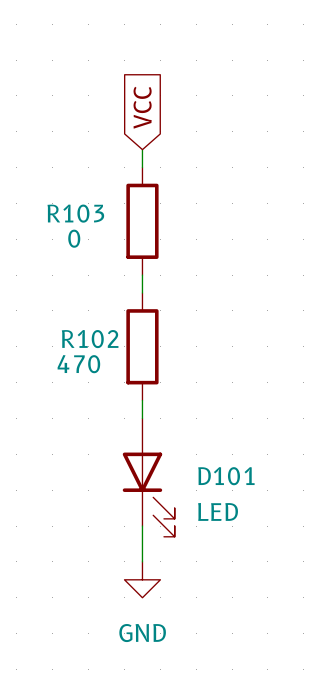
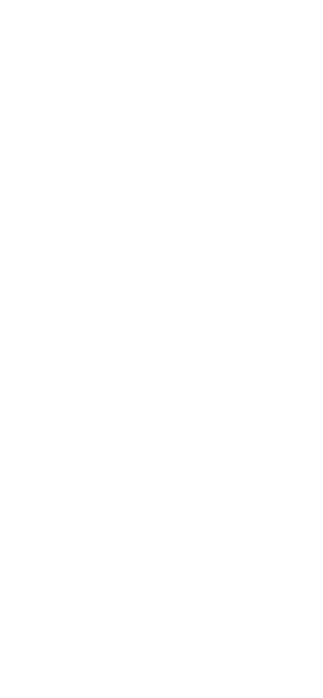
global label: VCC (142, 107) -> none
wire: (142, 149) (142, 167) -> none
R103: 0 (142, 221) -> none
wire: (142, 275) (142, 293) -> none
R102: 470 (142, 346) -> none
wire: (142, 400) (142, 418) -> none
D101: LED (148, 477) -> none
wire: (142, 526) (142, 561) -> none
power symbol: GND (142, 579) -> none

